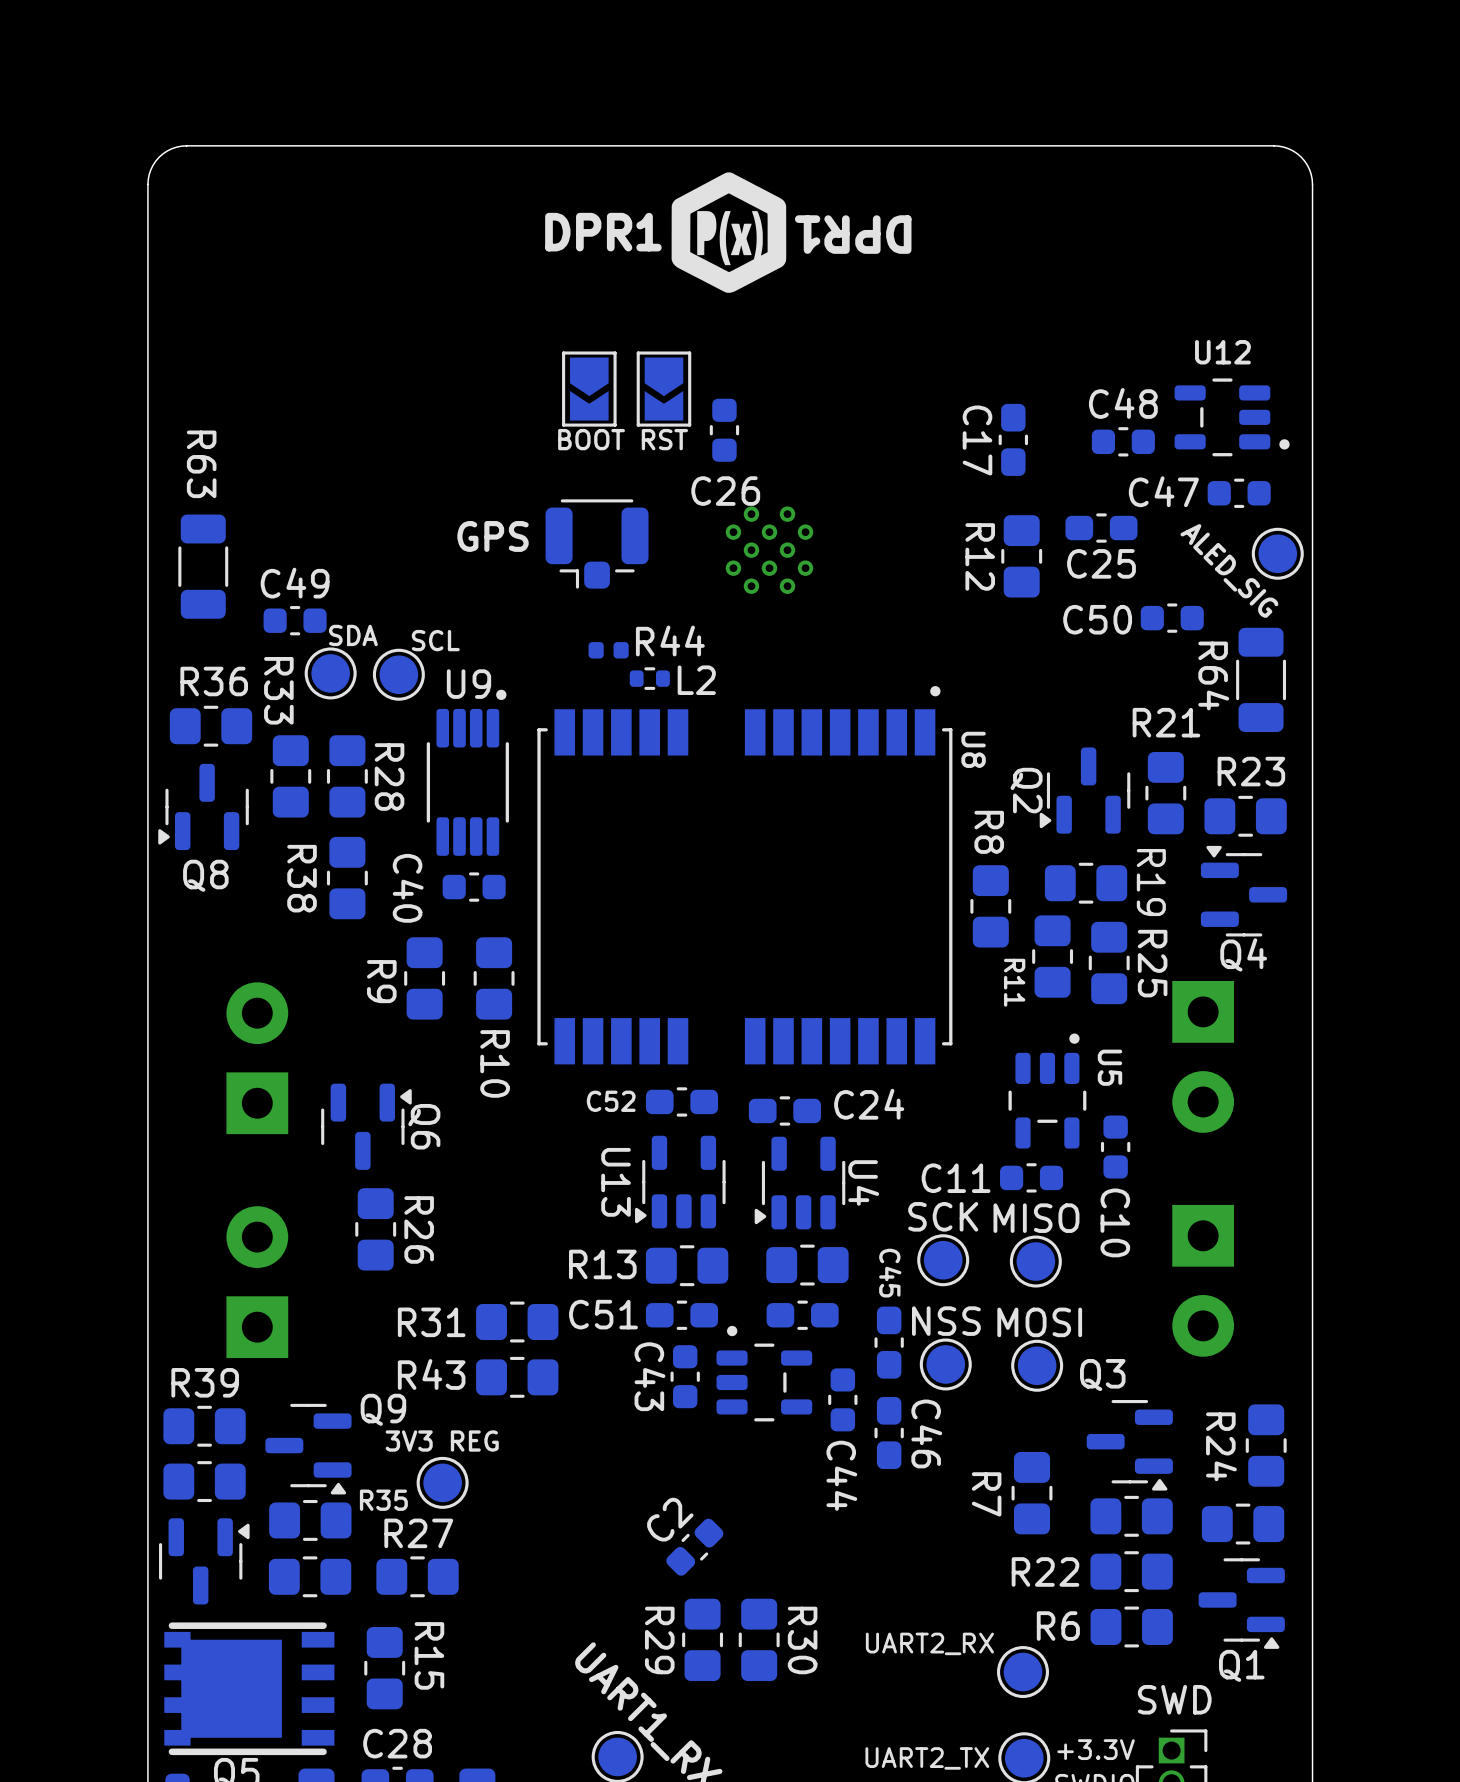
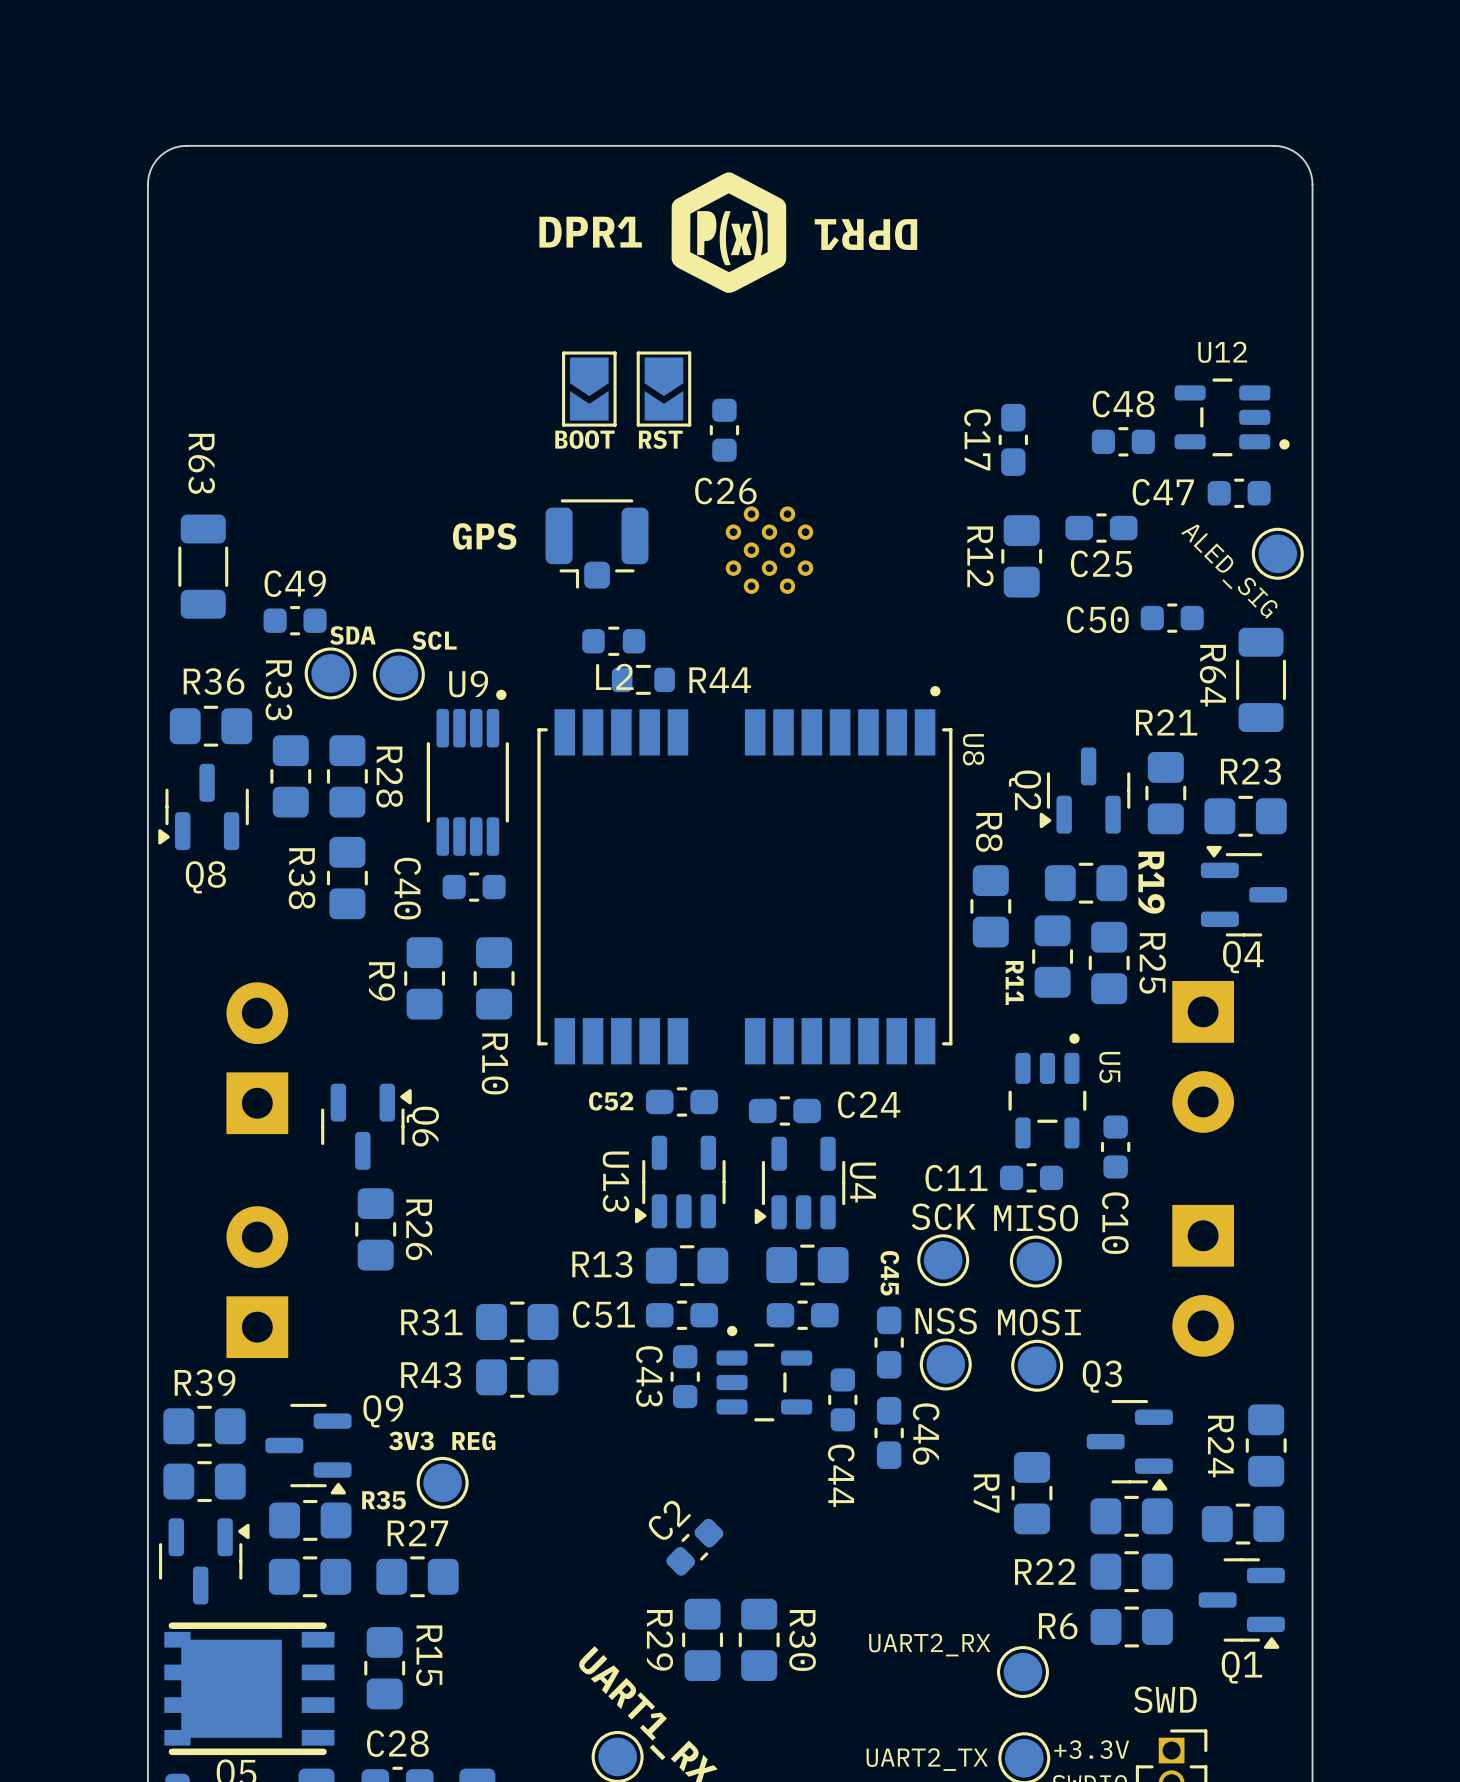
R44 name position: R44 (670, 640) -> R44 (720, 680)
L2 footprint: [588, 642, 629, 659] -> [582, 626, 646, 656]
R44 footprint: [629, 667, 670, 690] -> [611, 664, 675, 695]
L2 name position: L2 (696, 680) -> L2 (614, 676)

